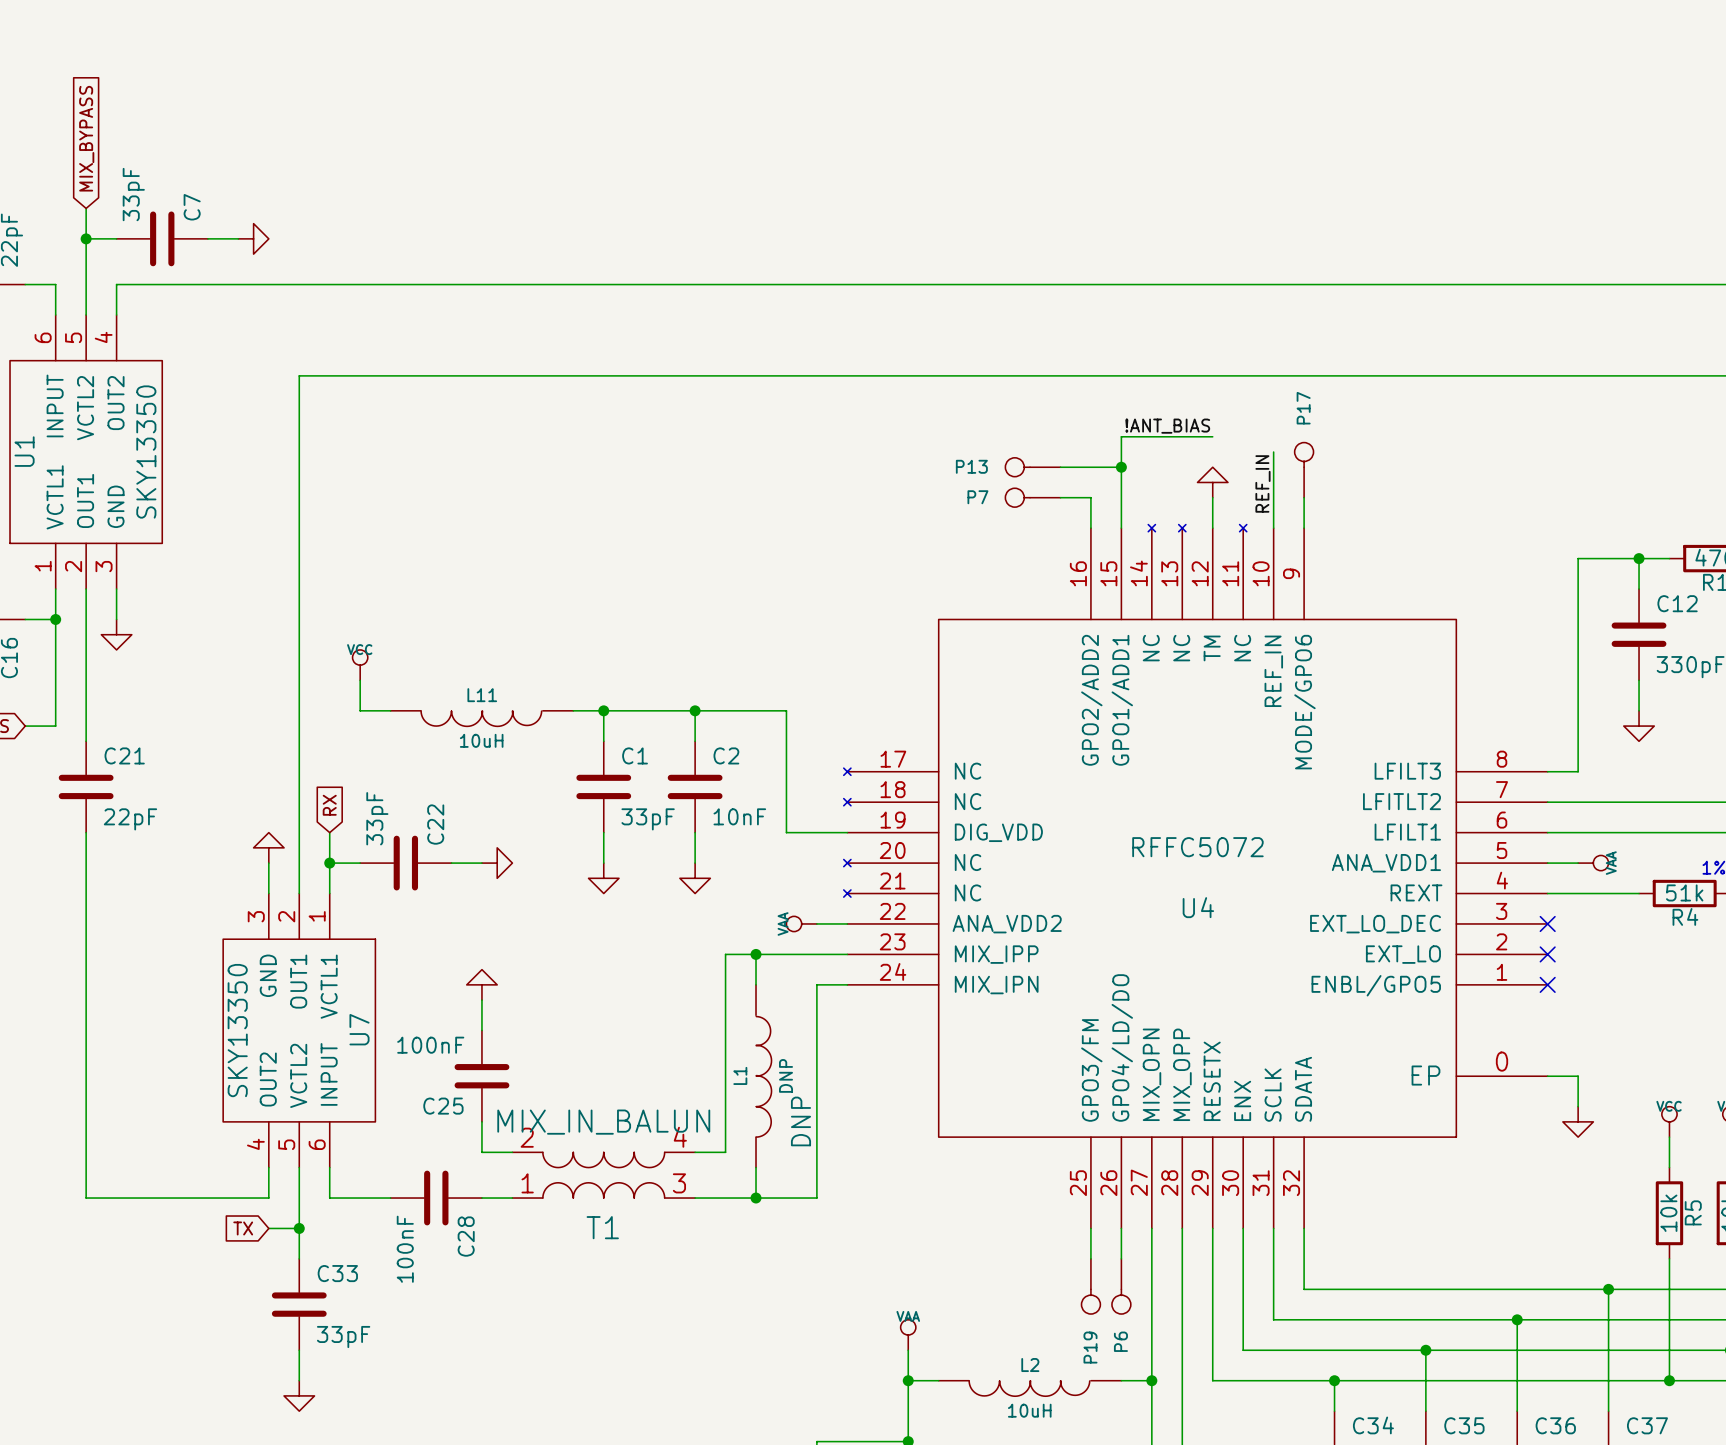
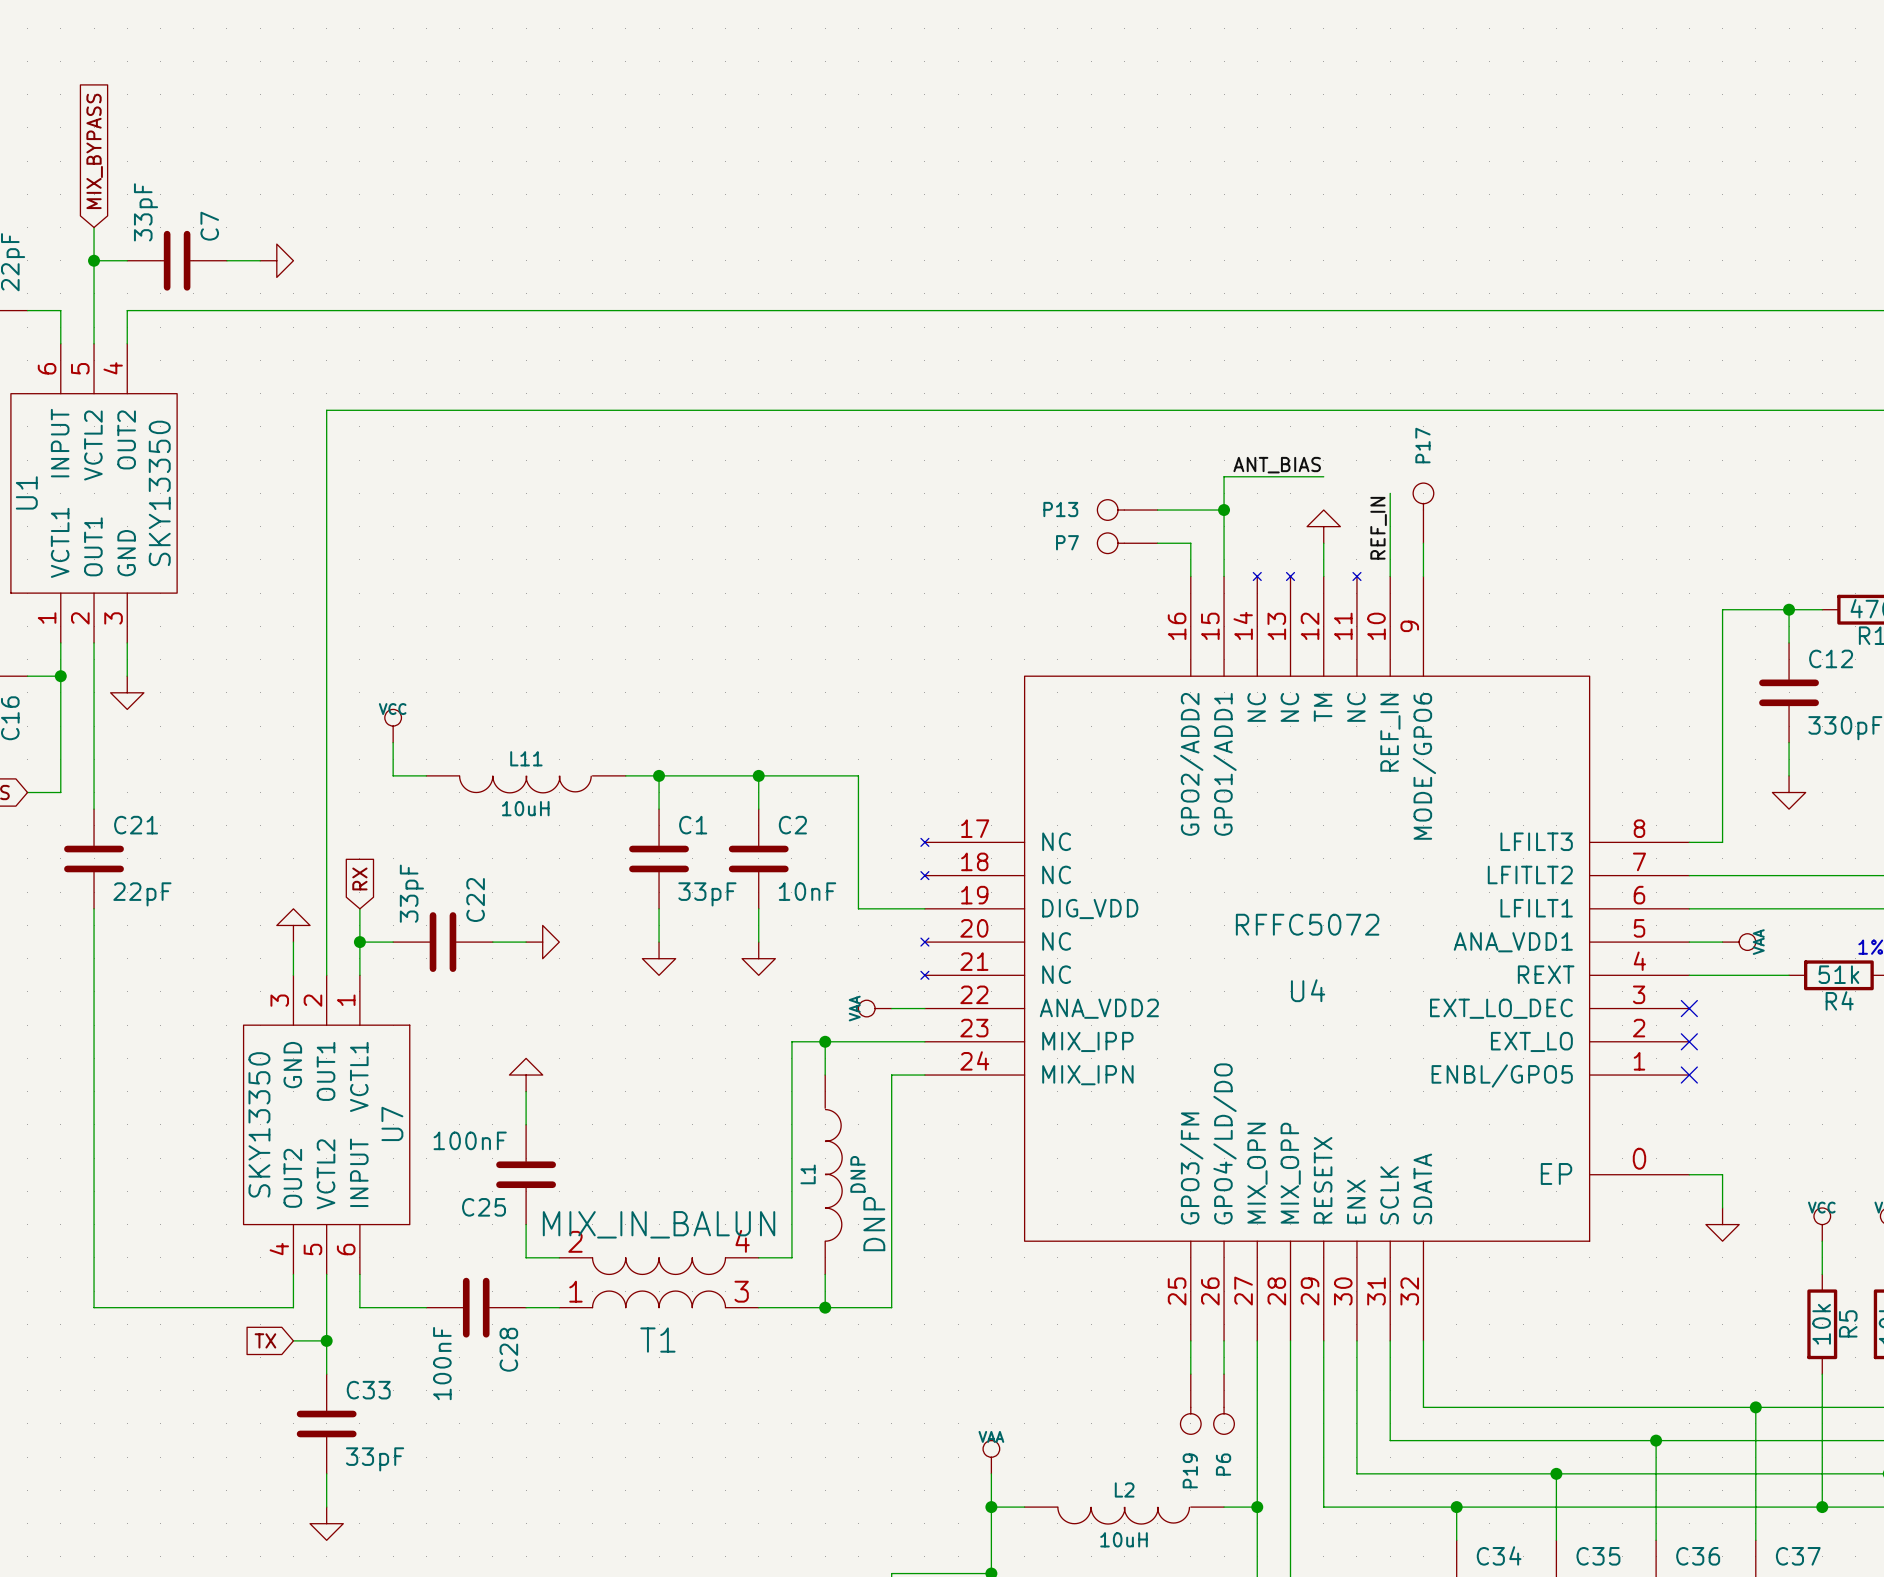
label: !ANT_BIAS (1167, 426) -> ANT_BIAS (1277, 465)

